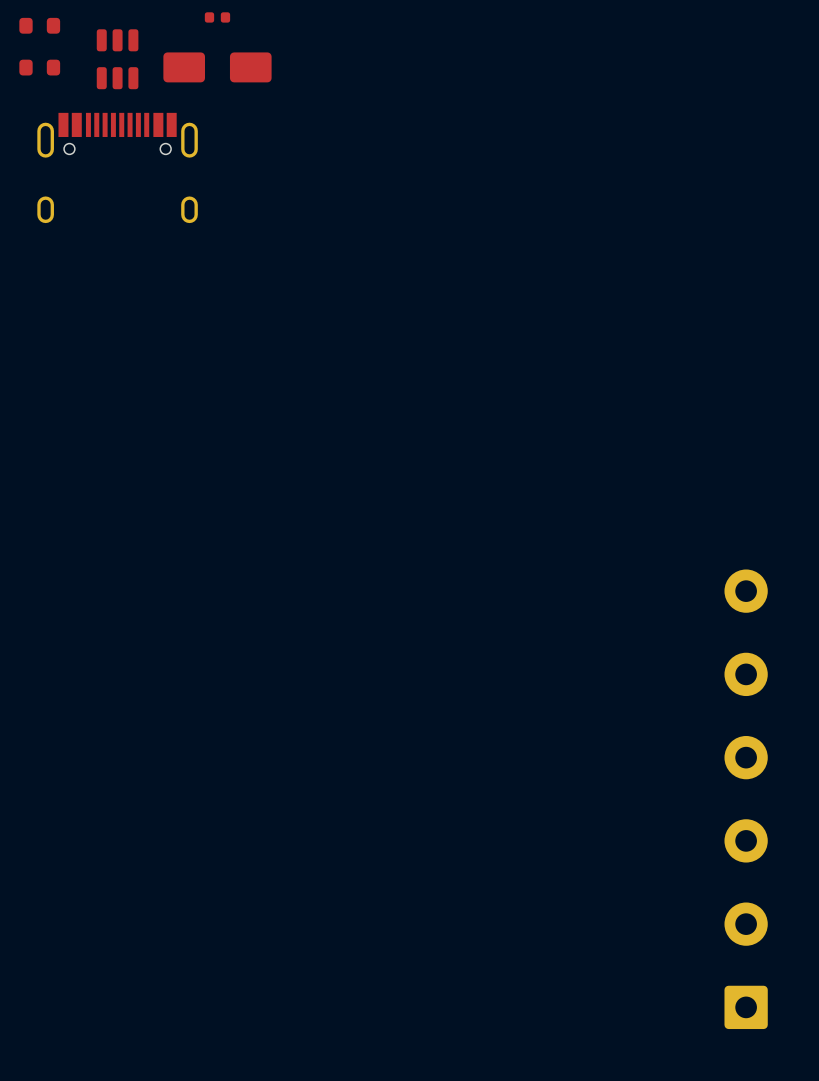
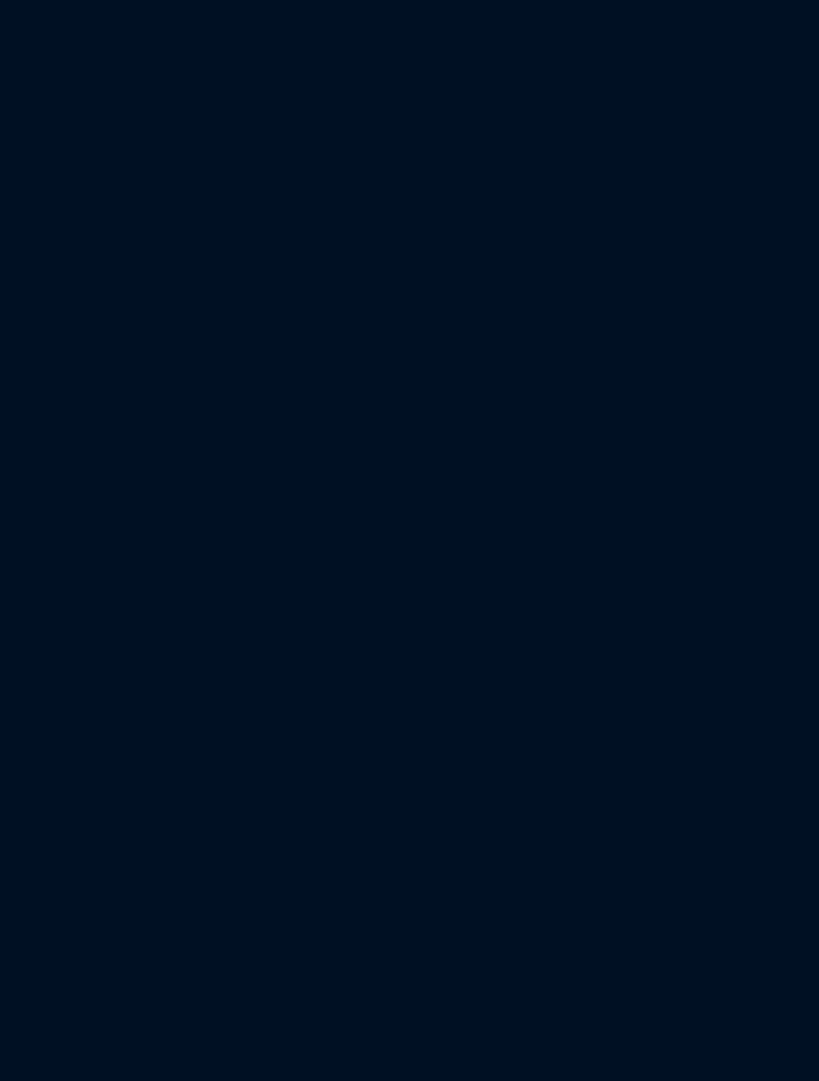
part: (217, 17) -> none
part: (39, 25) -> none
part: (117, 59) -> none
part: (39, 67) -> none
part: (217, 67) -> none
part: (117, 167) -> none
part: (746, 799) -> none

